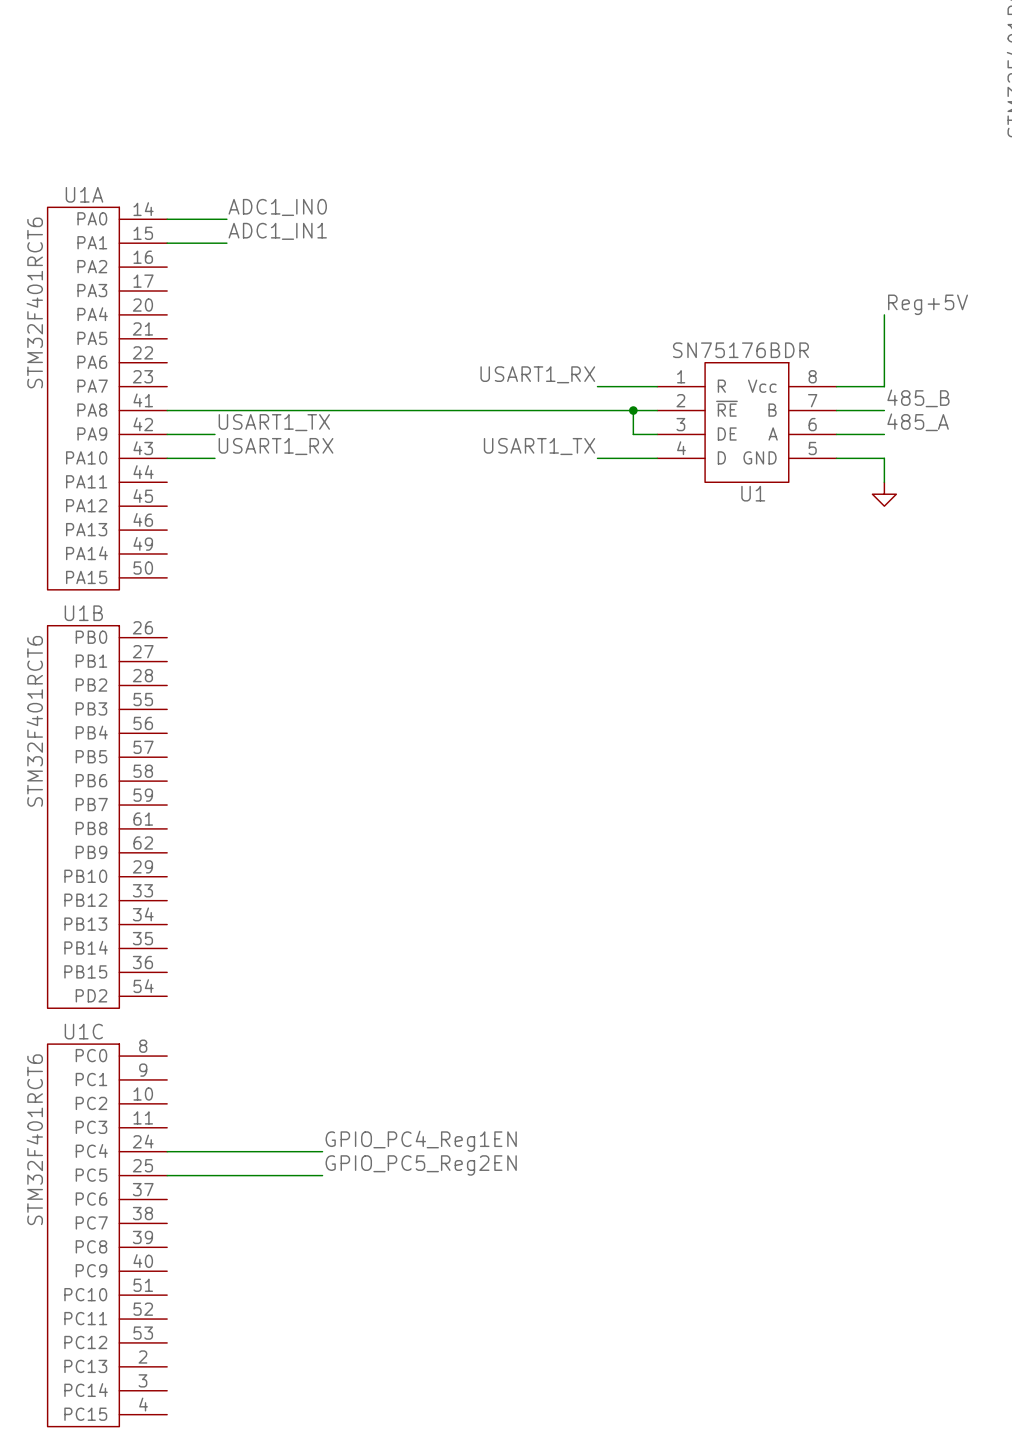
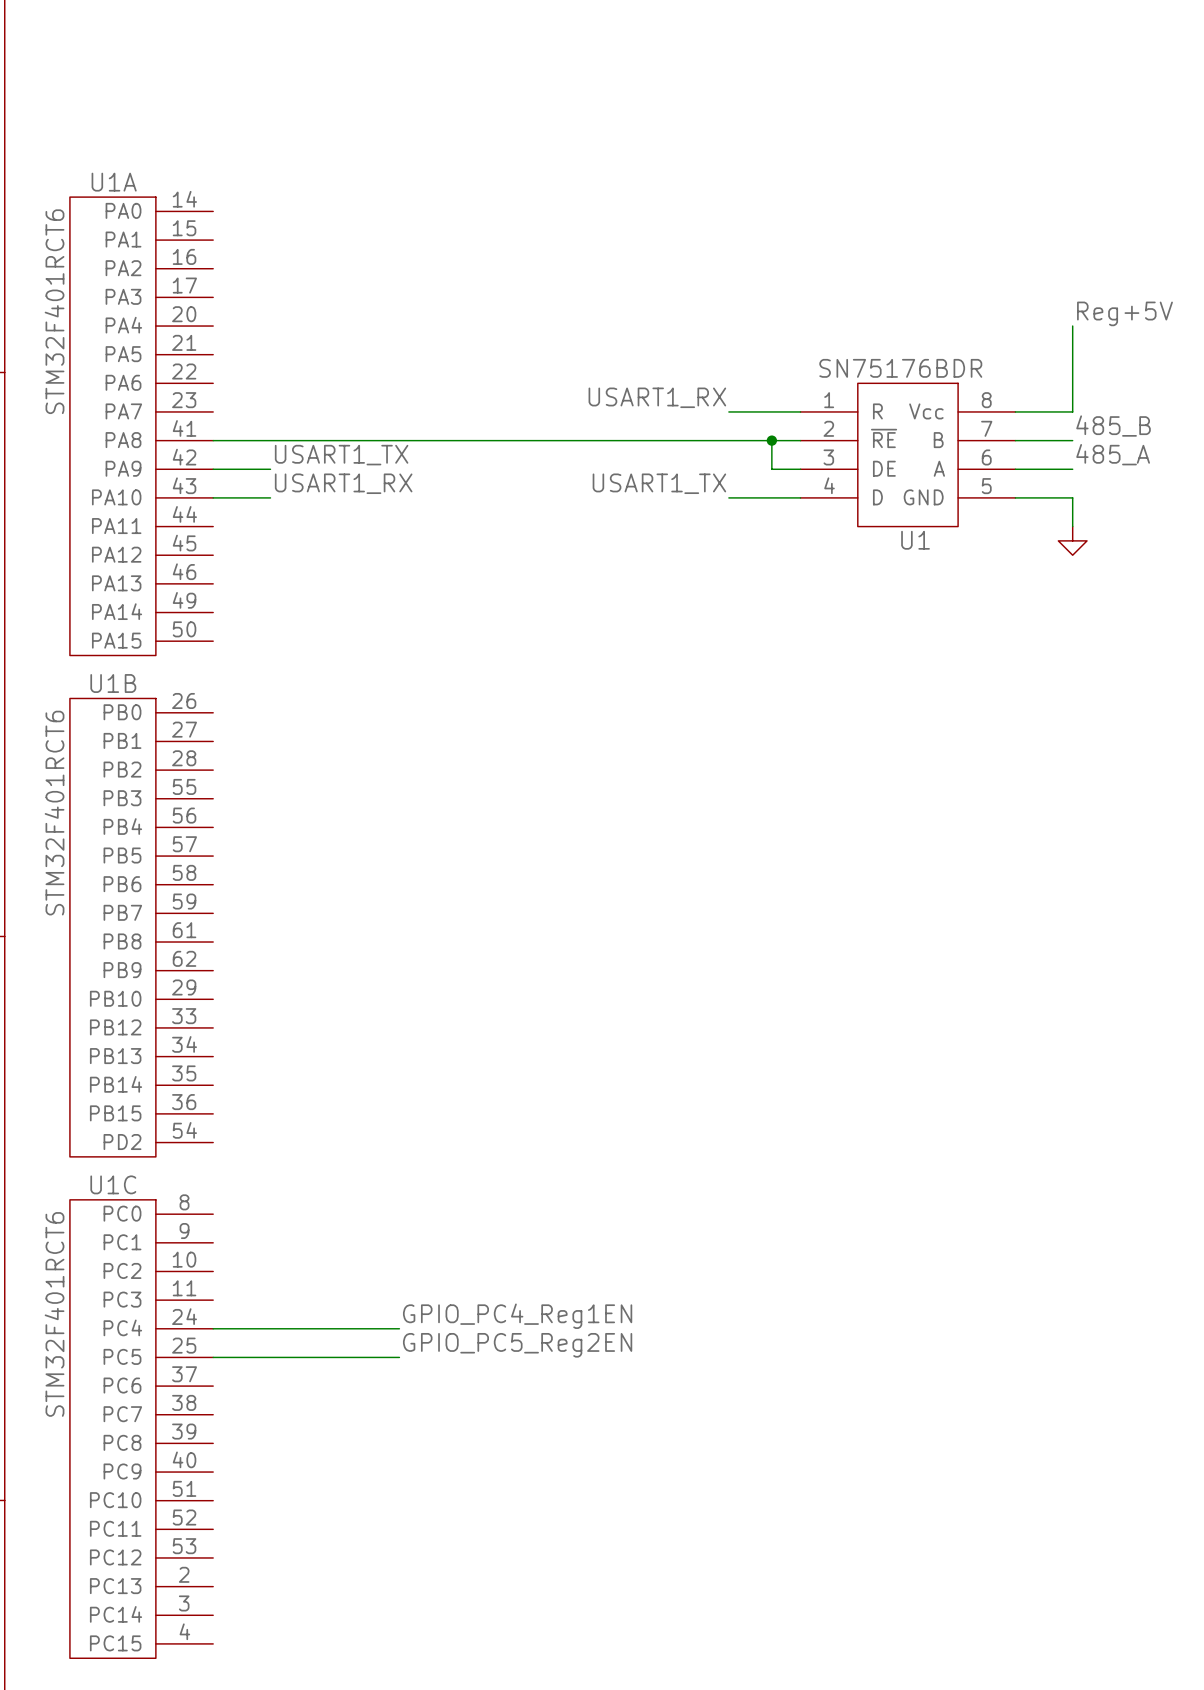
label: ADC1_IN0 (277, 207) -> none
wire: (167, 219) (226, 219) -> none
label: ADC1_IN1 (277, 231) -> none
wire: (167, 243) (226, 243) -> none

